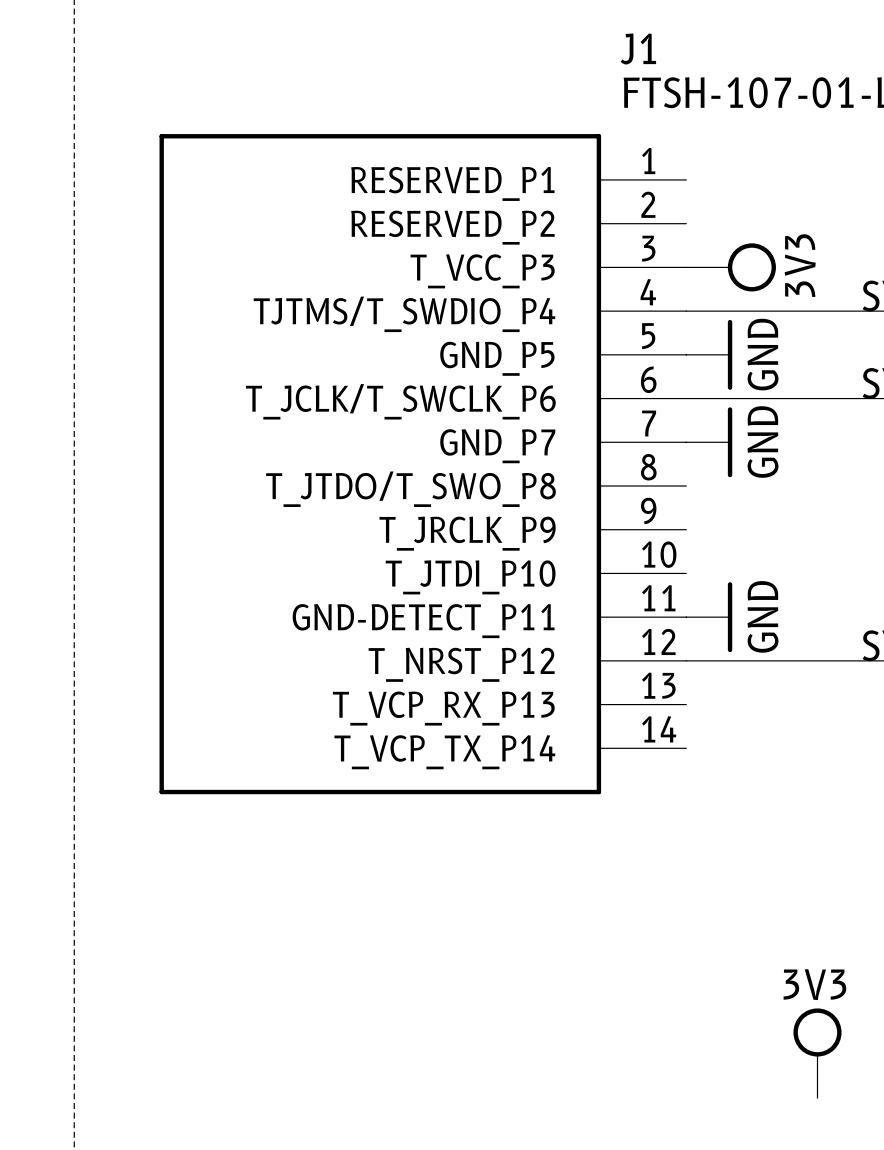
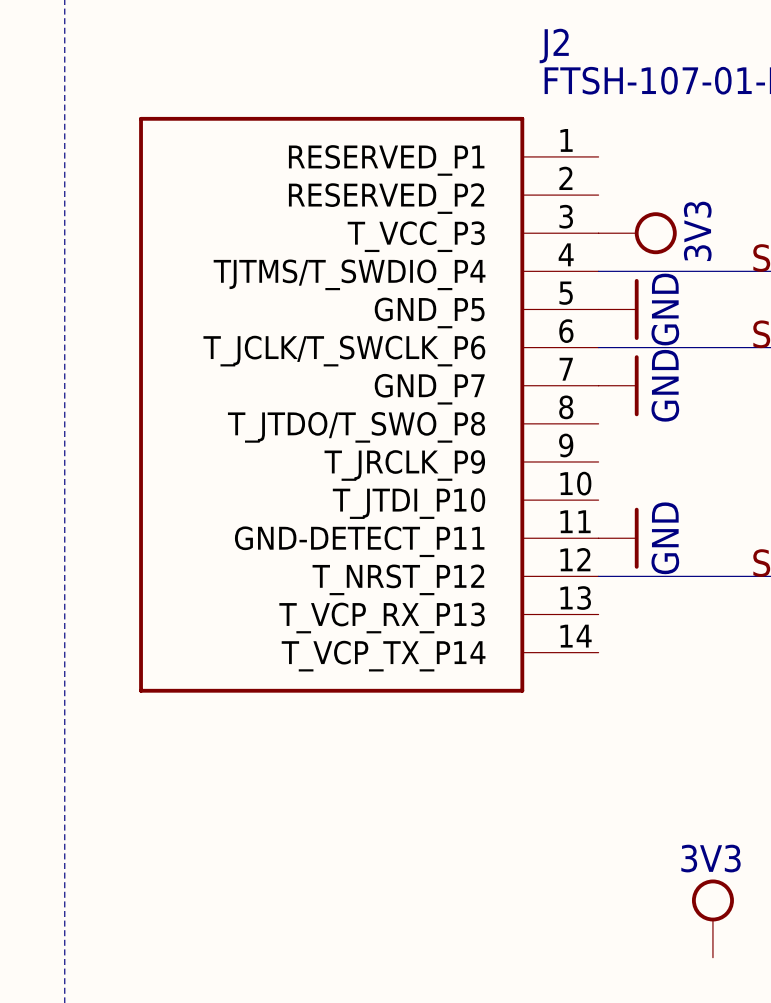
J1 name: J1 (638, 48) -> J2 (554, 45)

